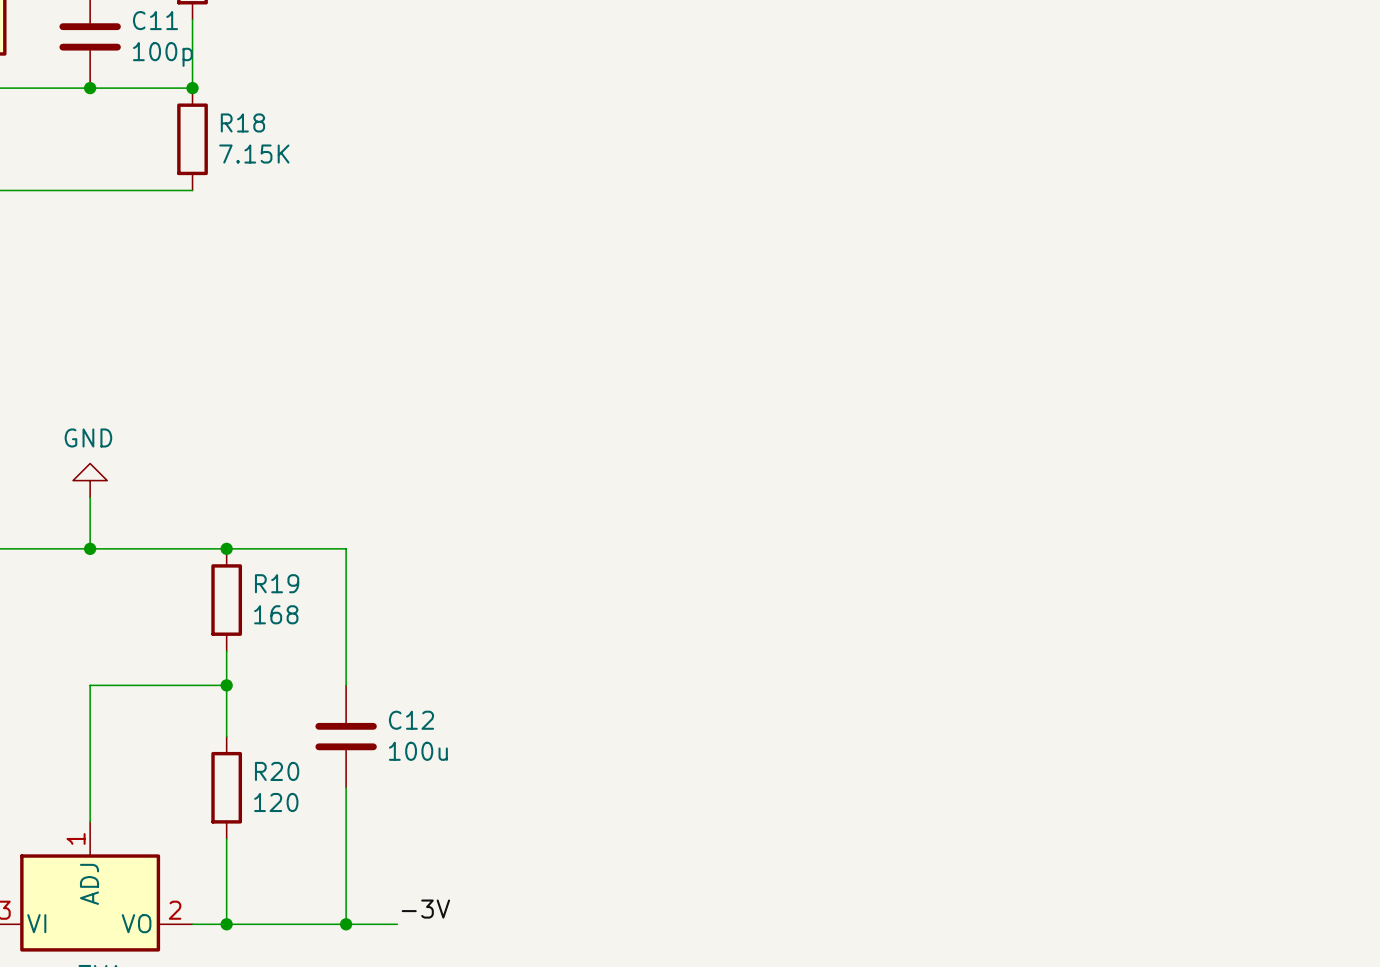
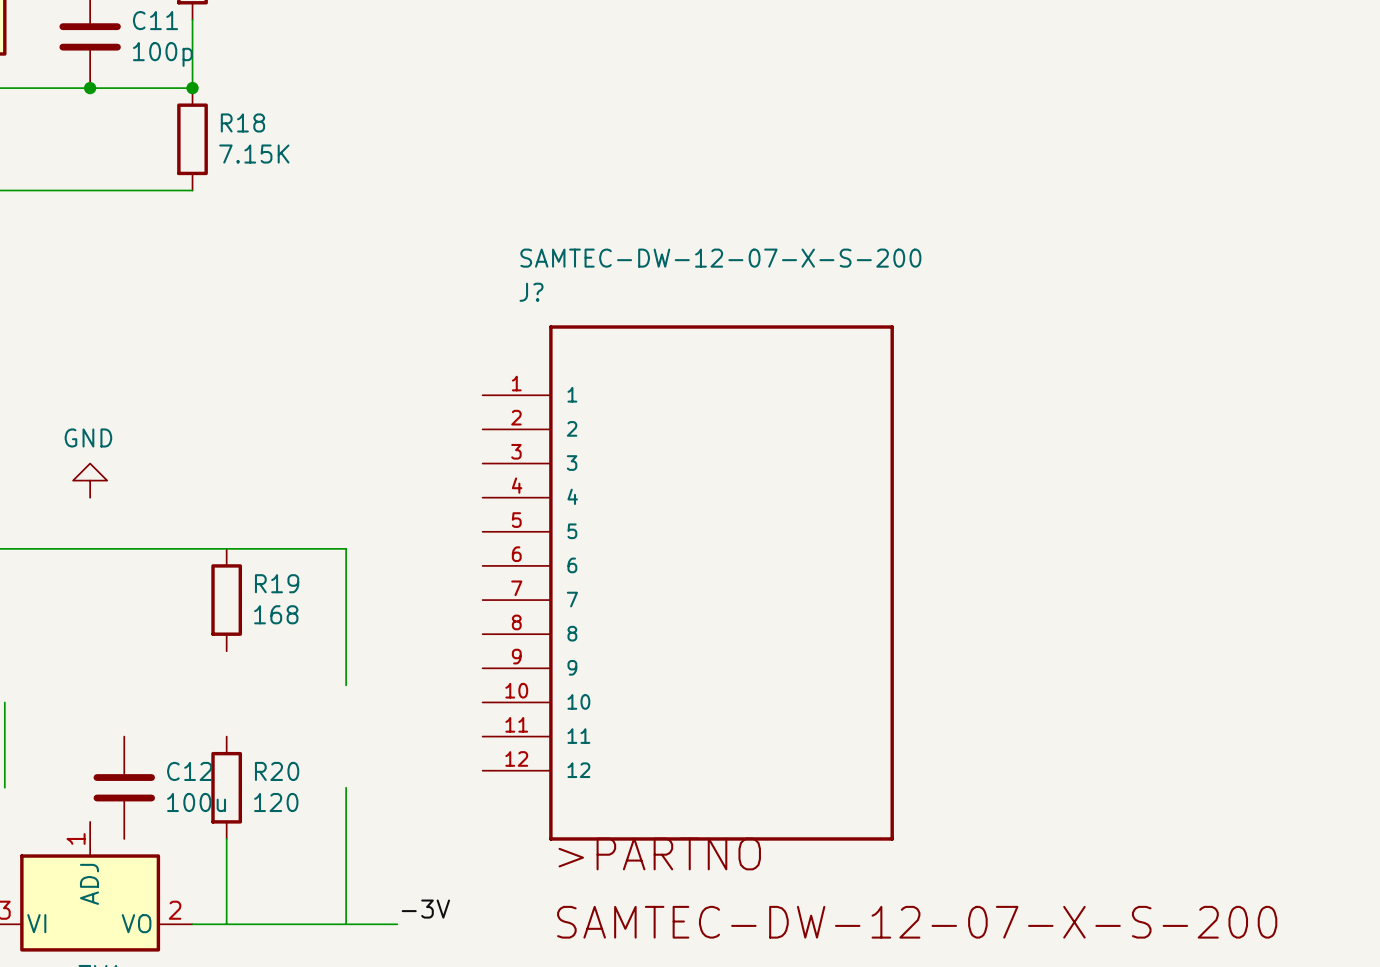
wire: (90, 497) (90, 548) -> none
junction: (90, 548) -> none
junction: (226, 548) -> none
J?: none -> SAMTEC-DW-12-07-X-S-200 (688, 582)
wire: (226, 651) (226, 736) -> (4, 702) (4, 787)
wire: (226, 685) (90, 685) (90, 821) -> none
junction: (226, 685) -> none
C12 position: (346, 736) -> (124, 787)
junction: (226, 924) -> none
junction: (346, 924) -> none

